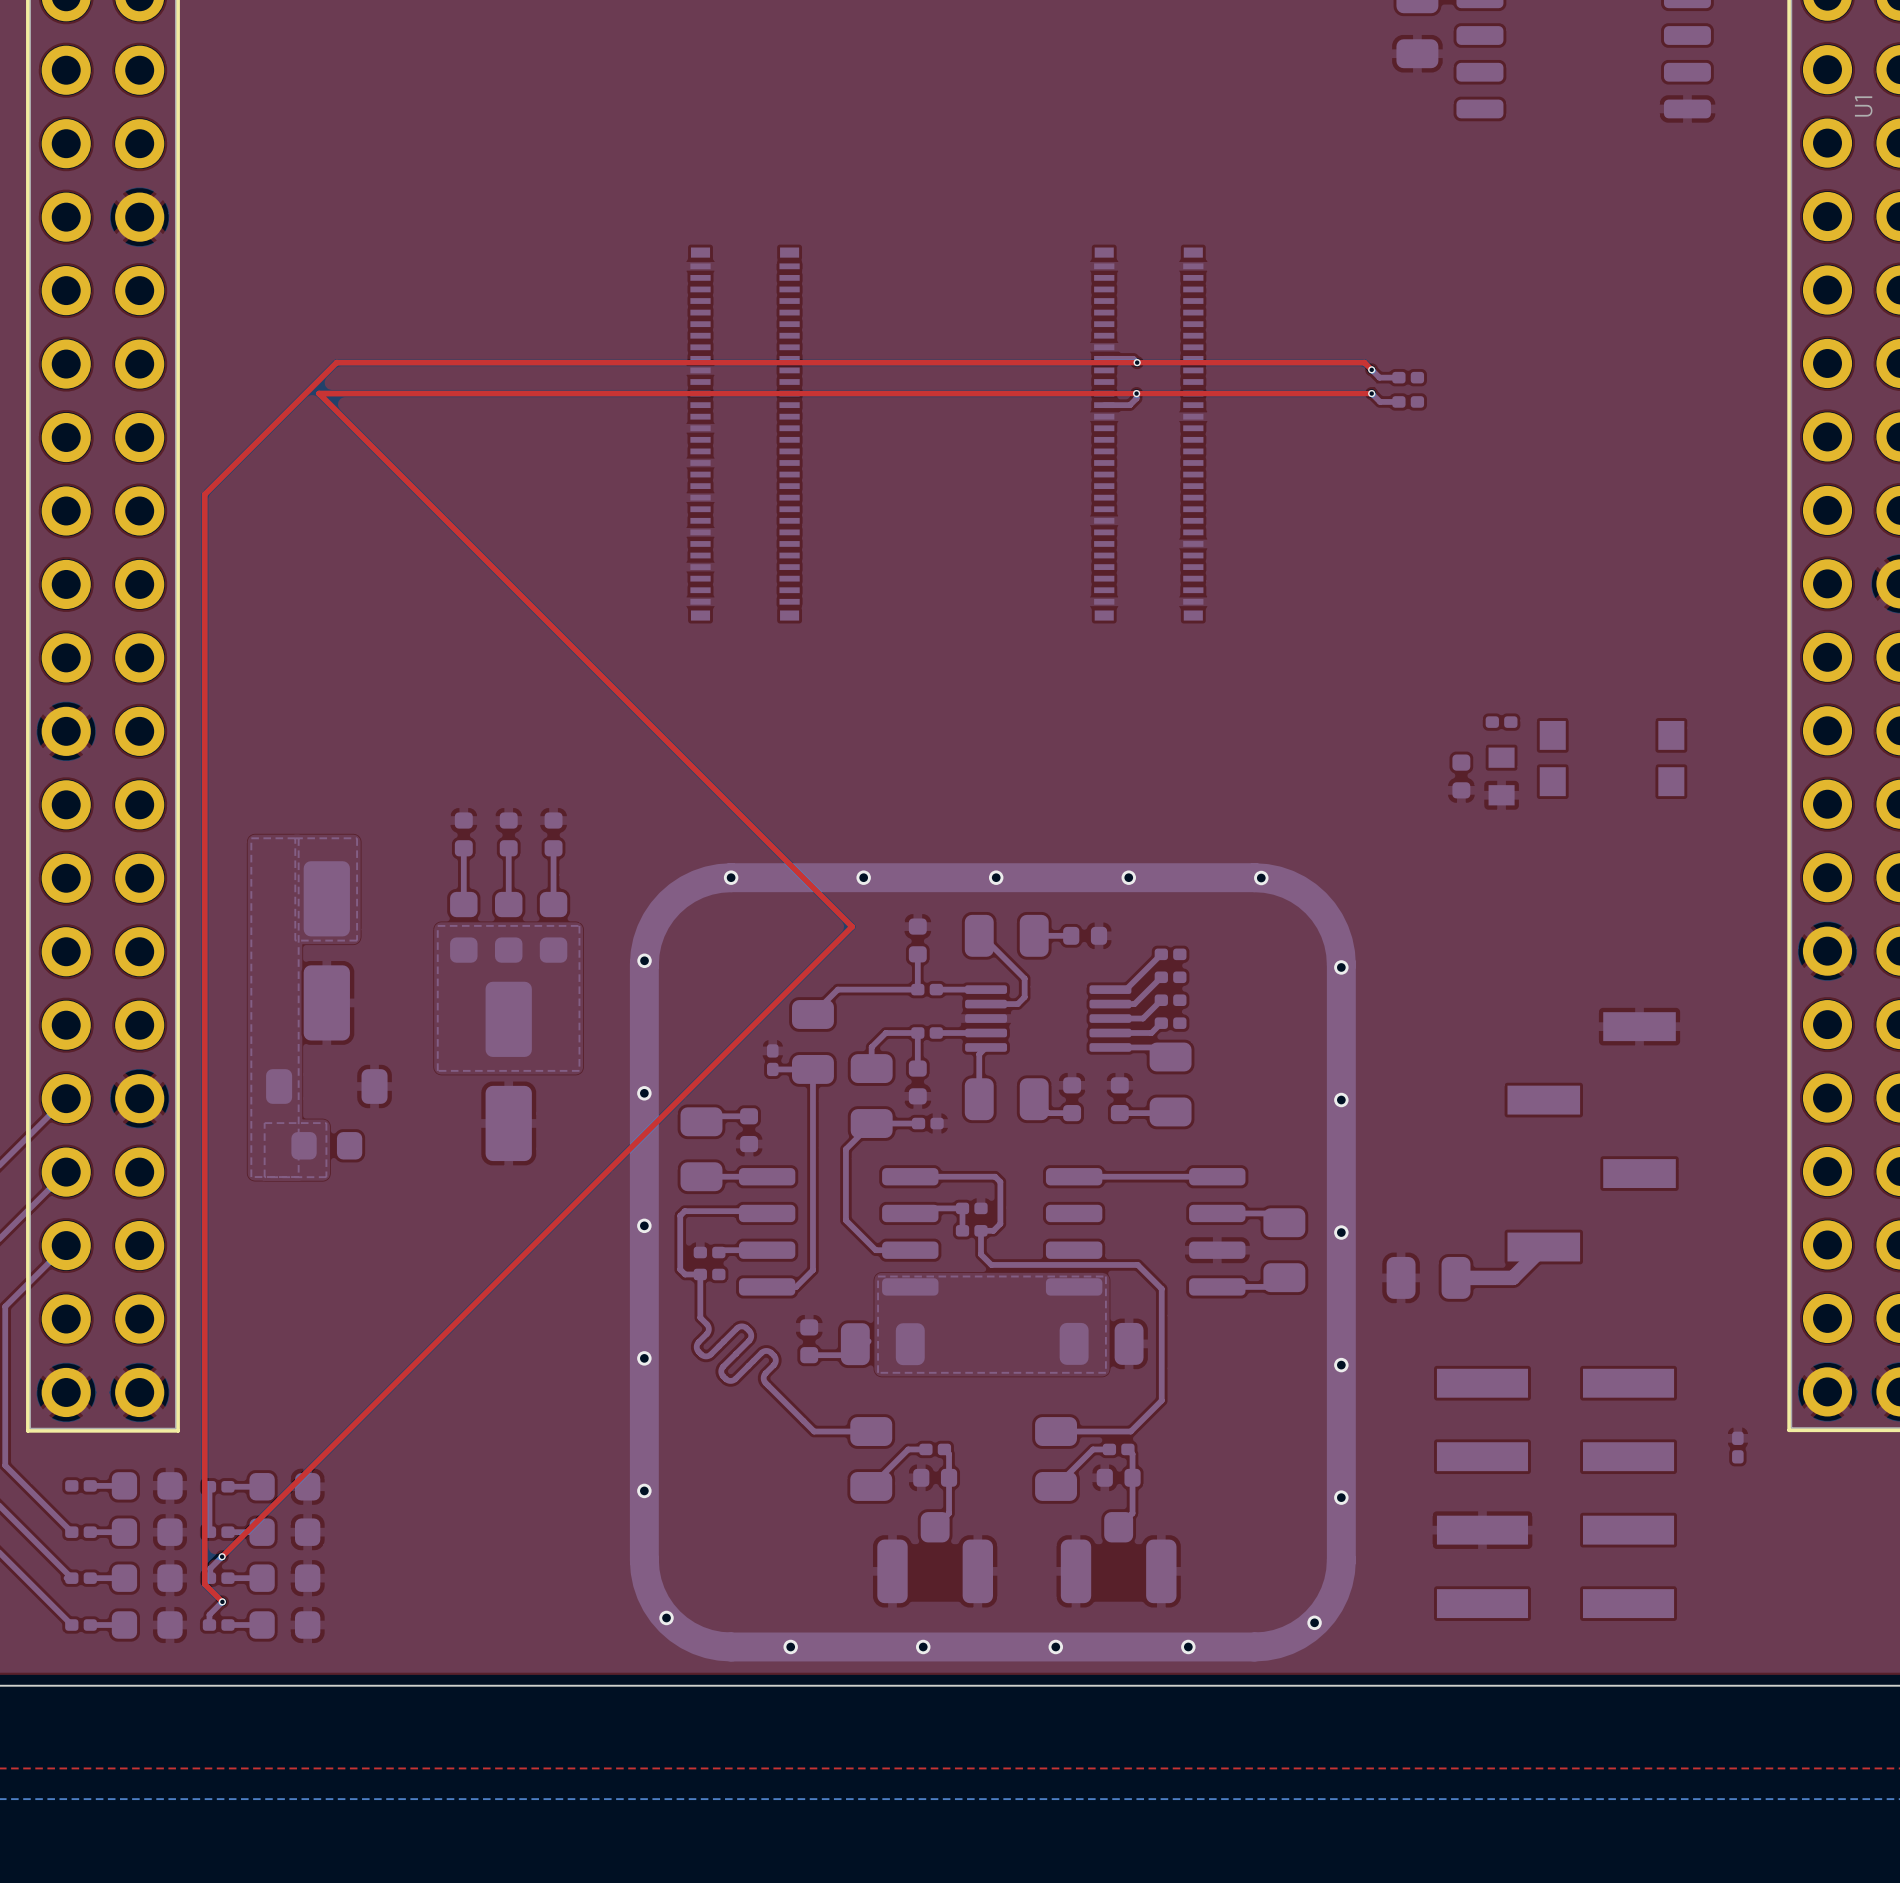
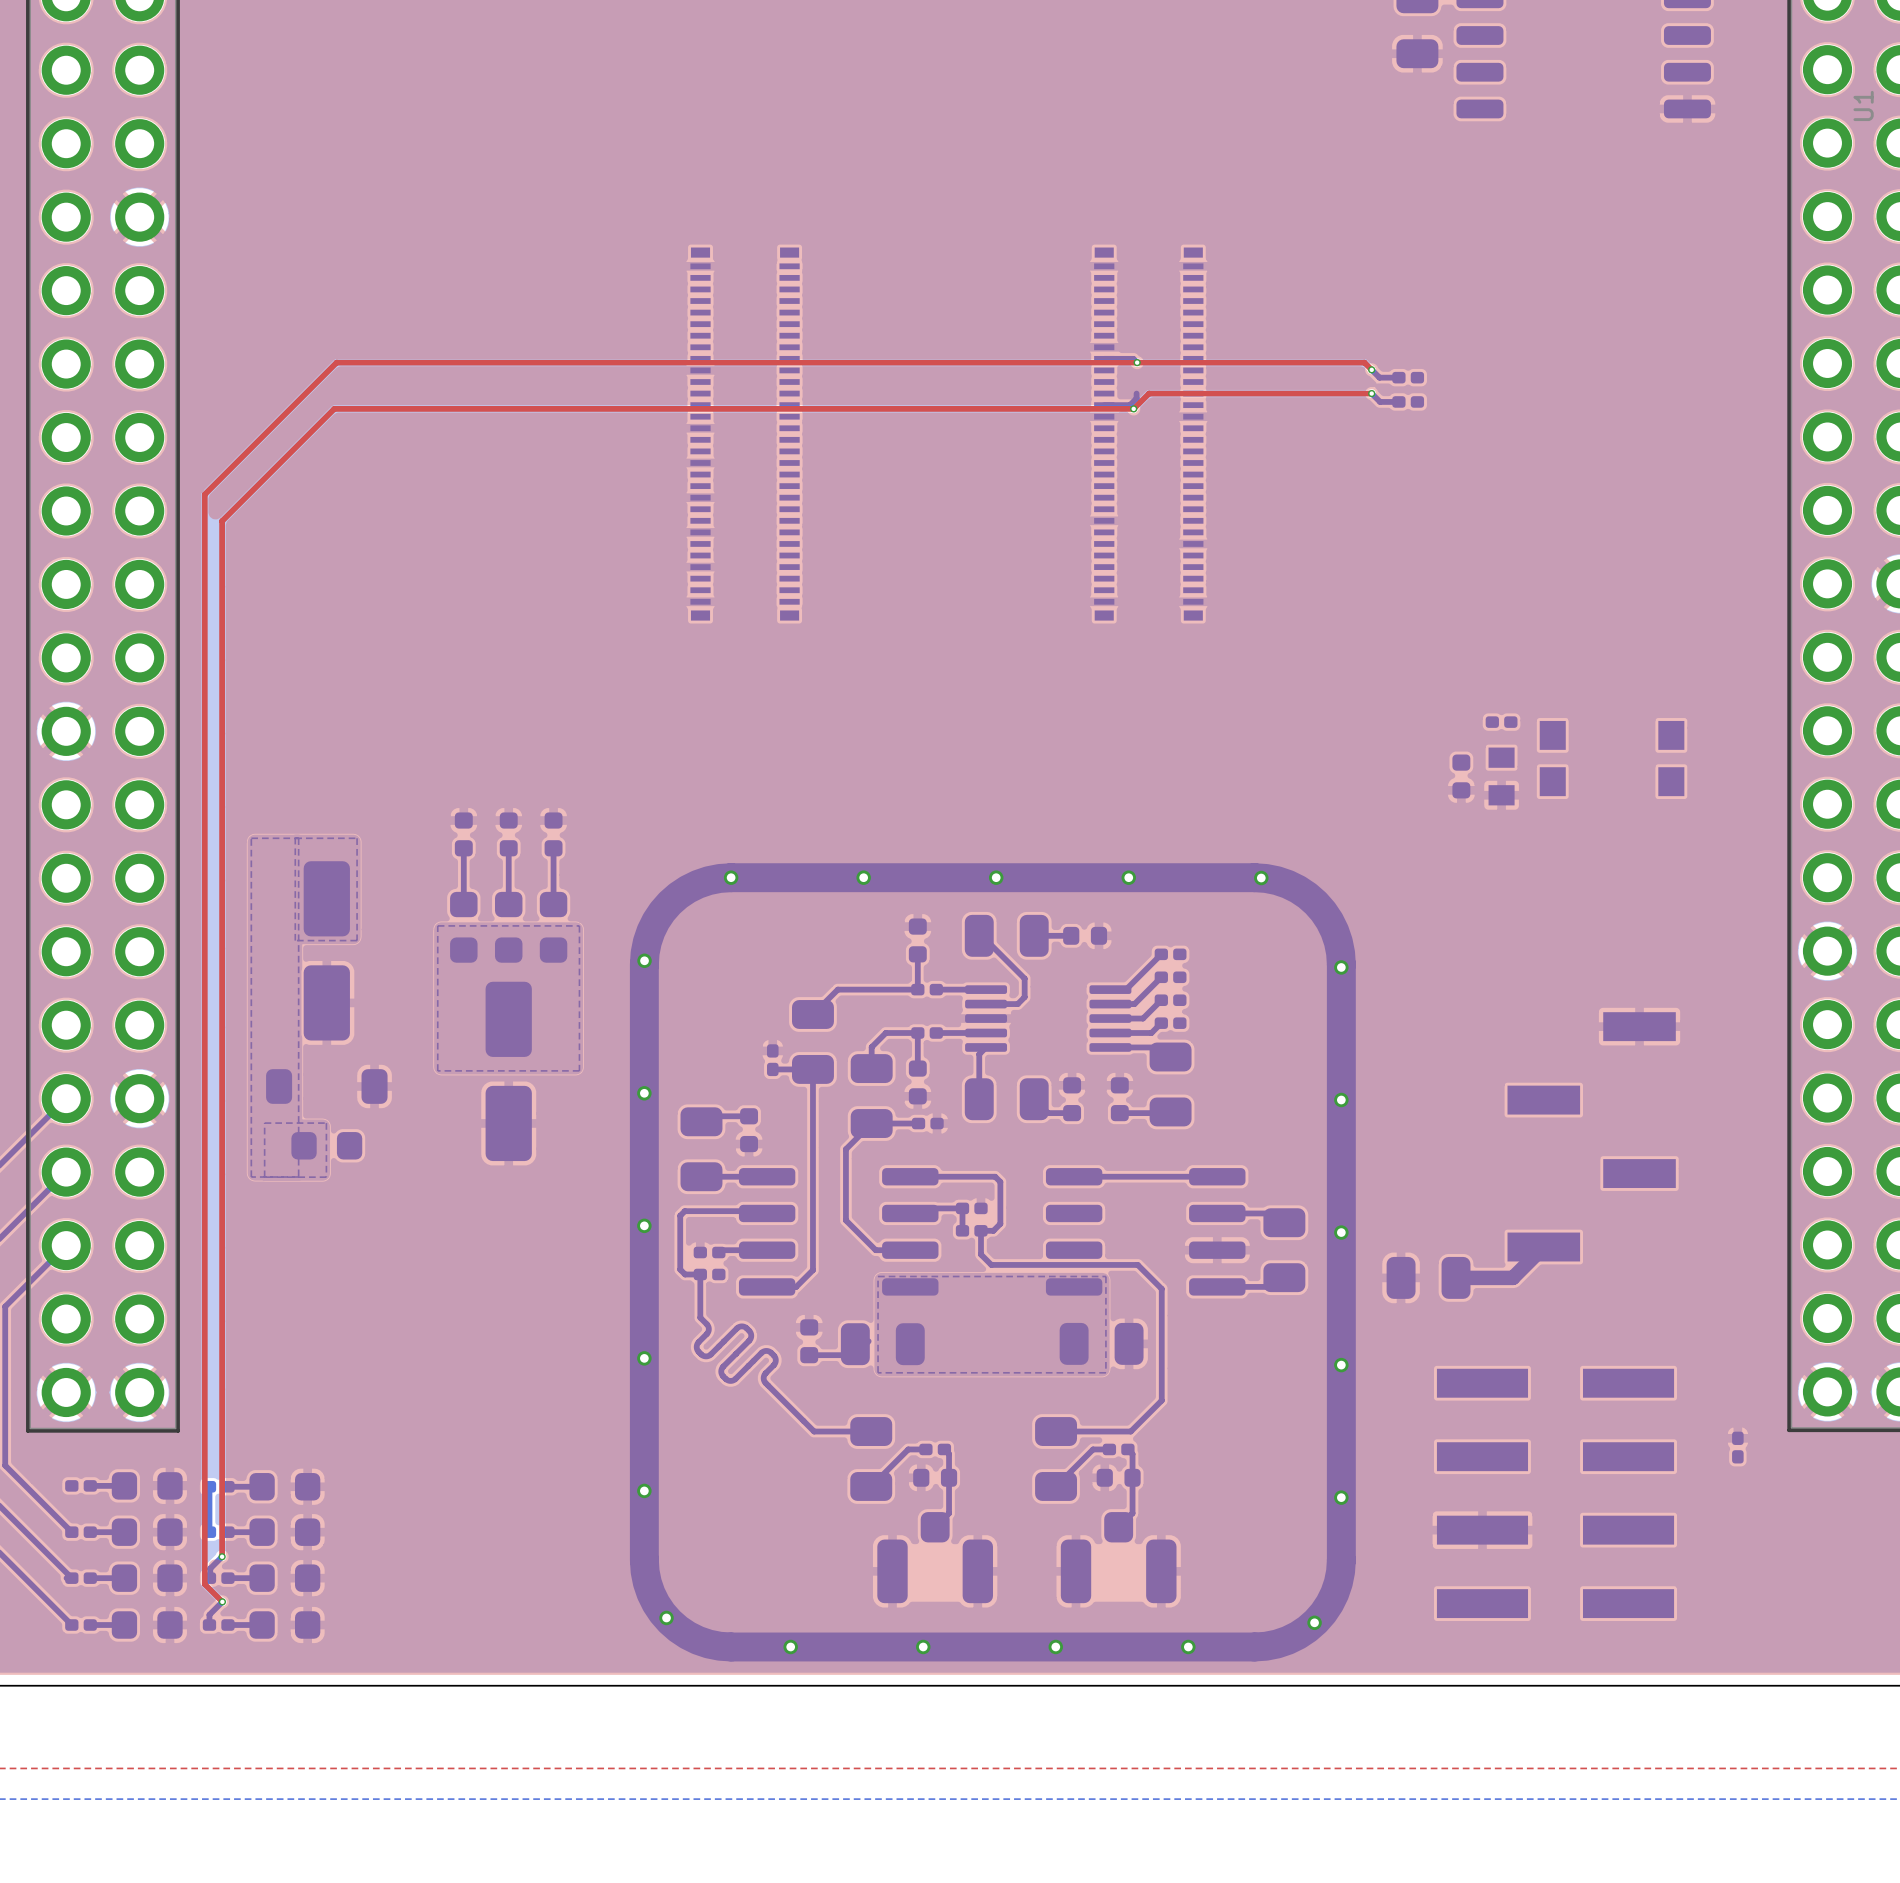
via position: (1136, 393) -> (1133, 408)
top track: (1149, 393) (319, 393) (852, 926) (222, 1556) -> (1149, 393) (1133, 408) (334, 408) (222, 521) (222, 1556)

